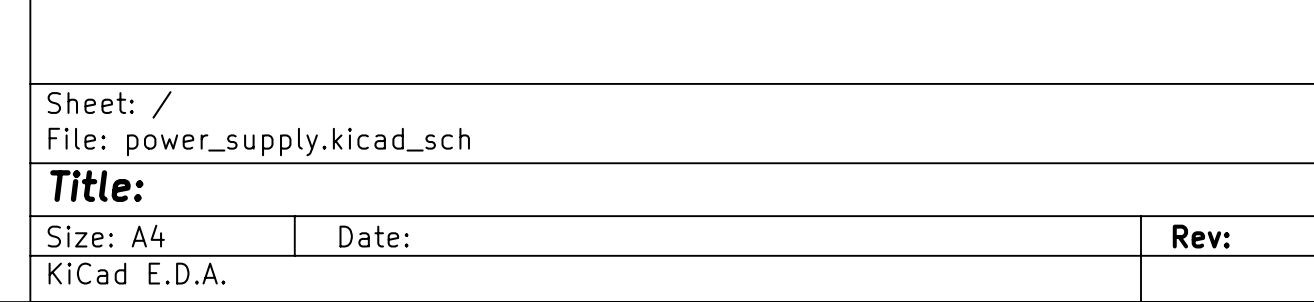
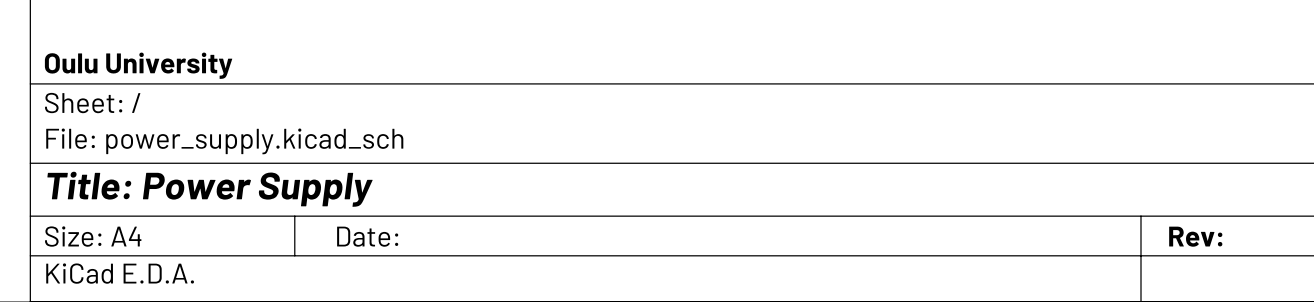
title block: none -> Oulu University (138, 65)
title block: Title: (96, 186) -> Title: Power Supply (210, 189)

